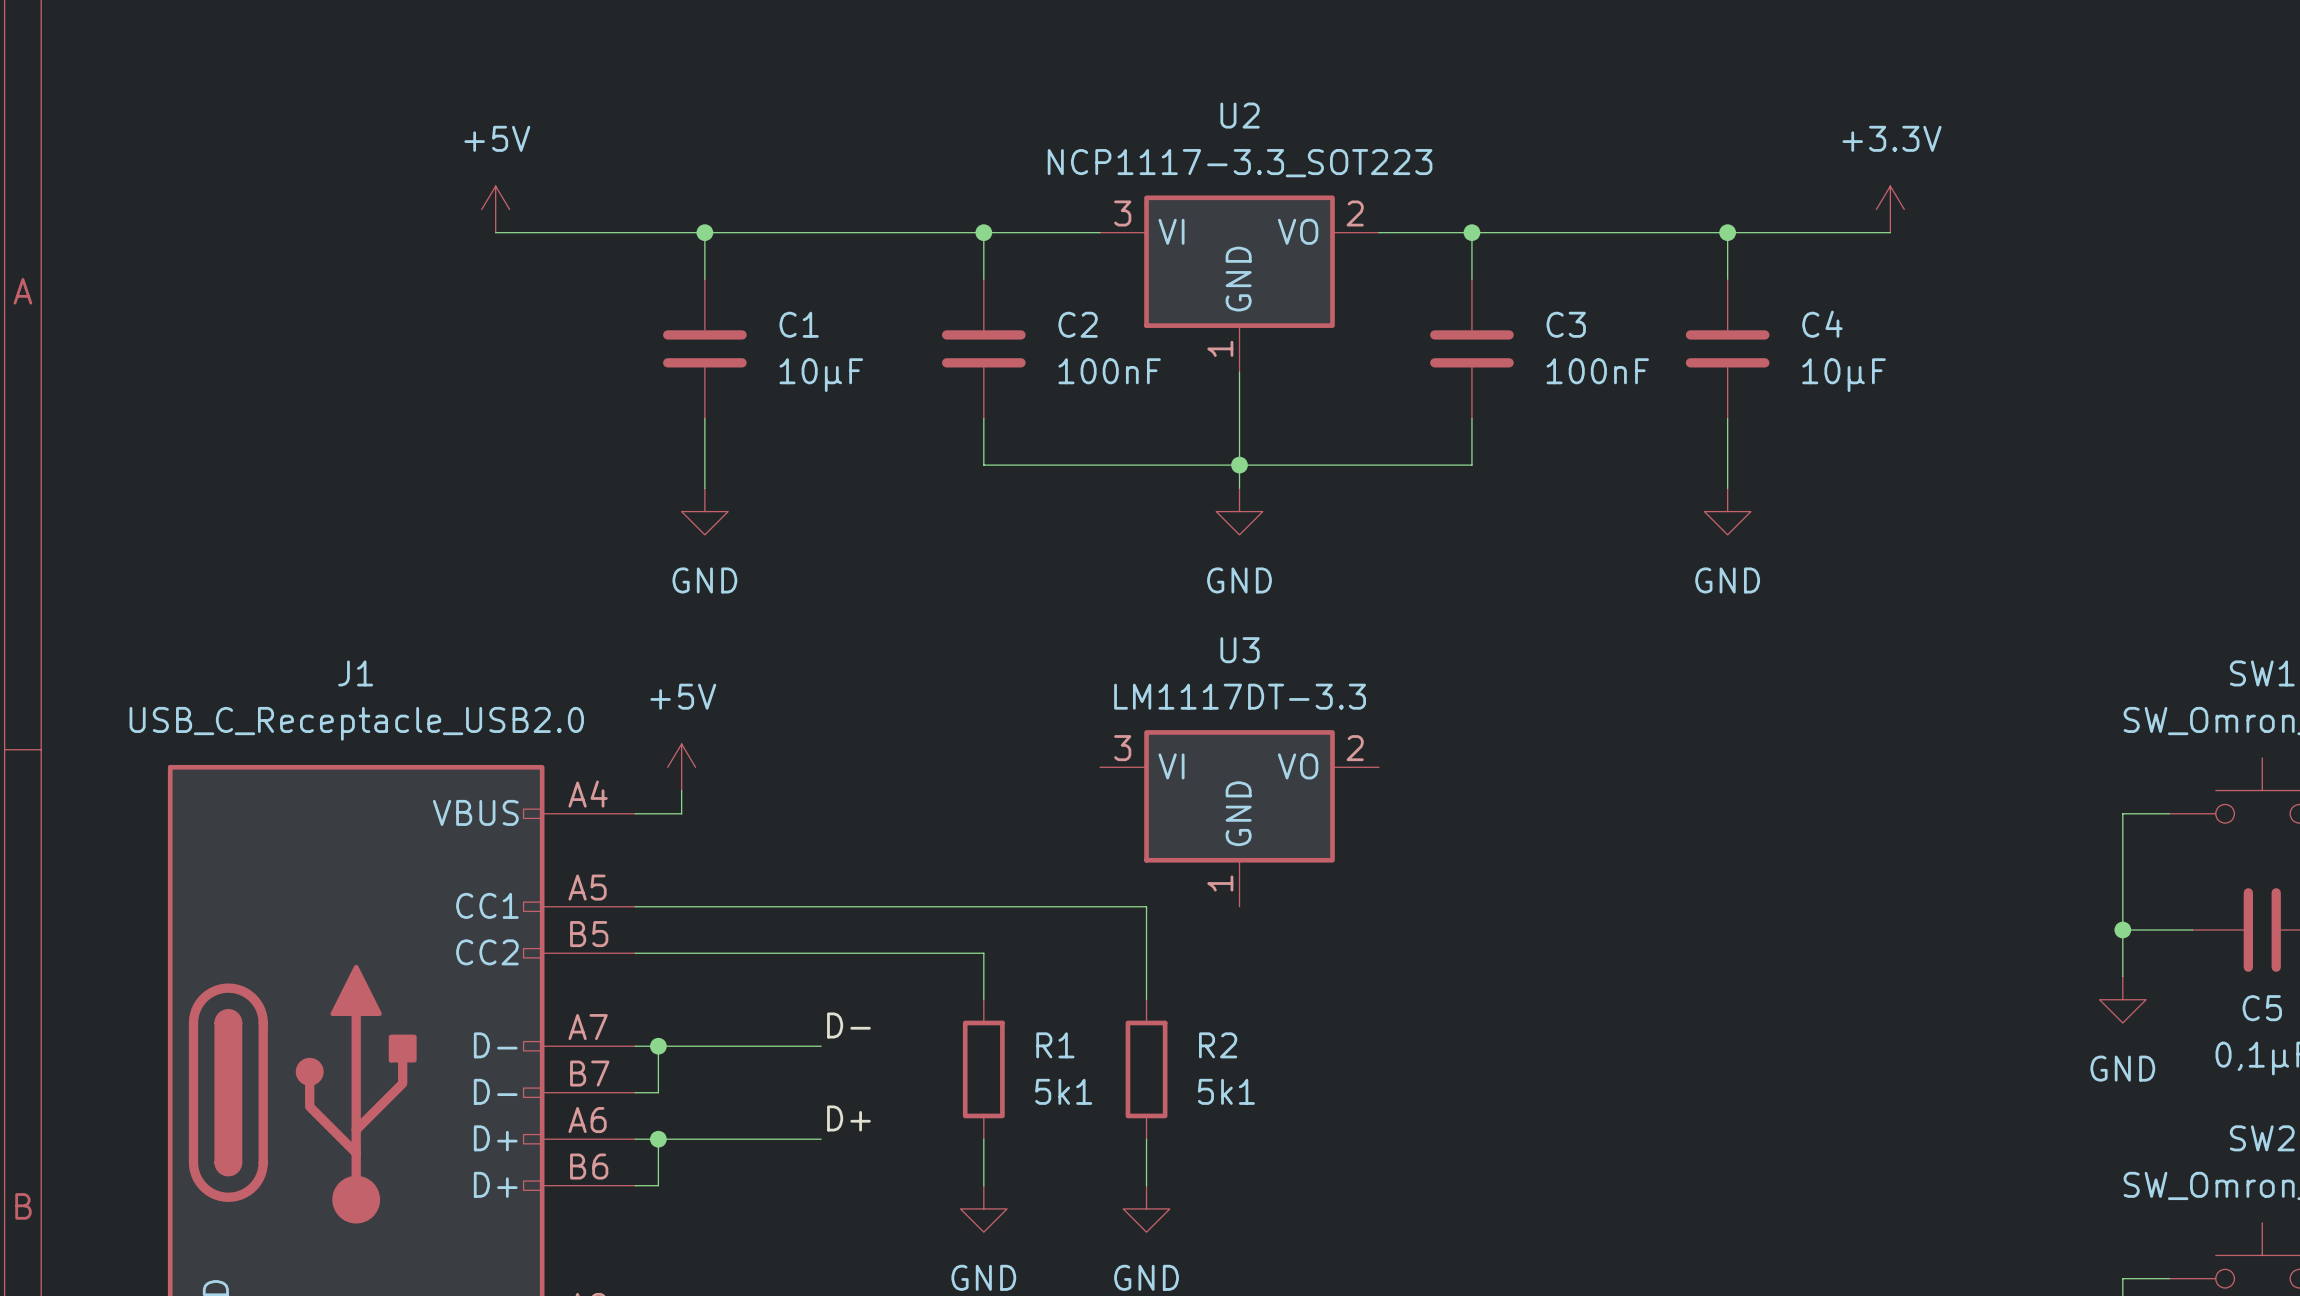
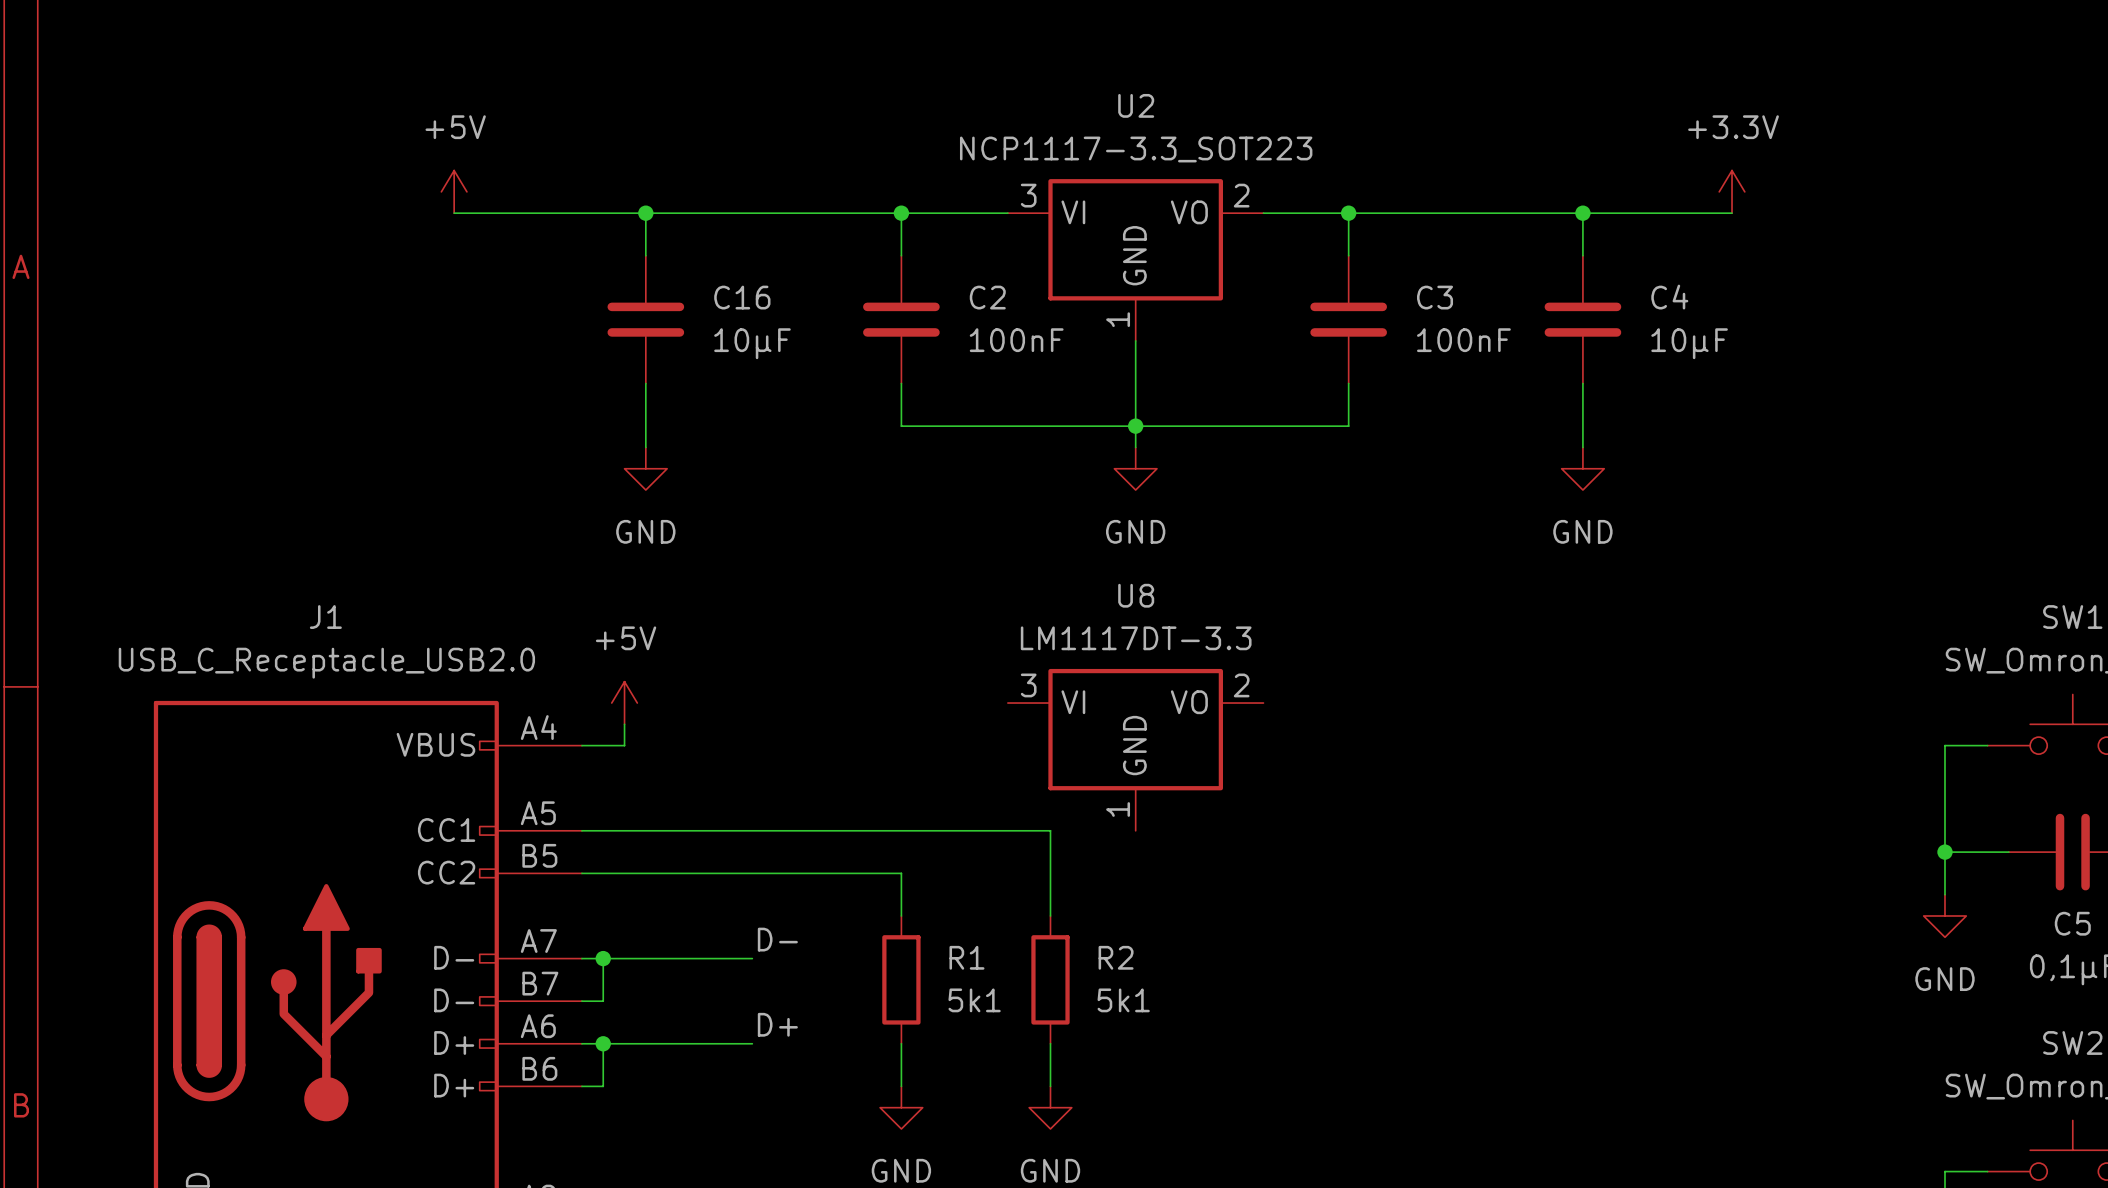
C1 name: C1 (799, 324) -> C16 (742, 297)
U3 name: U3 (1240, 650) -> U8 (1136, 595)

